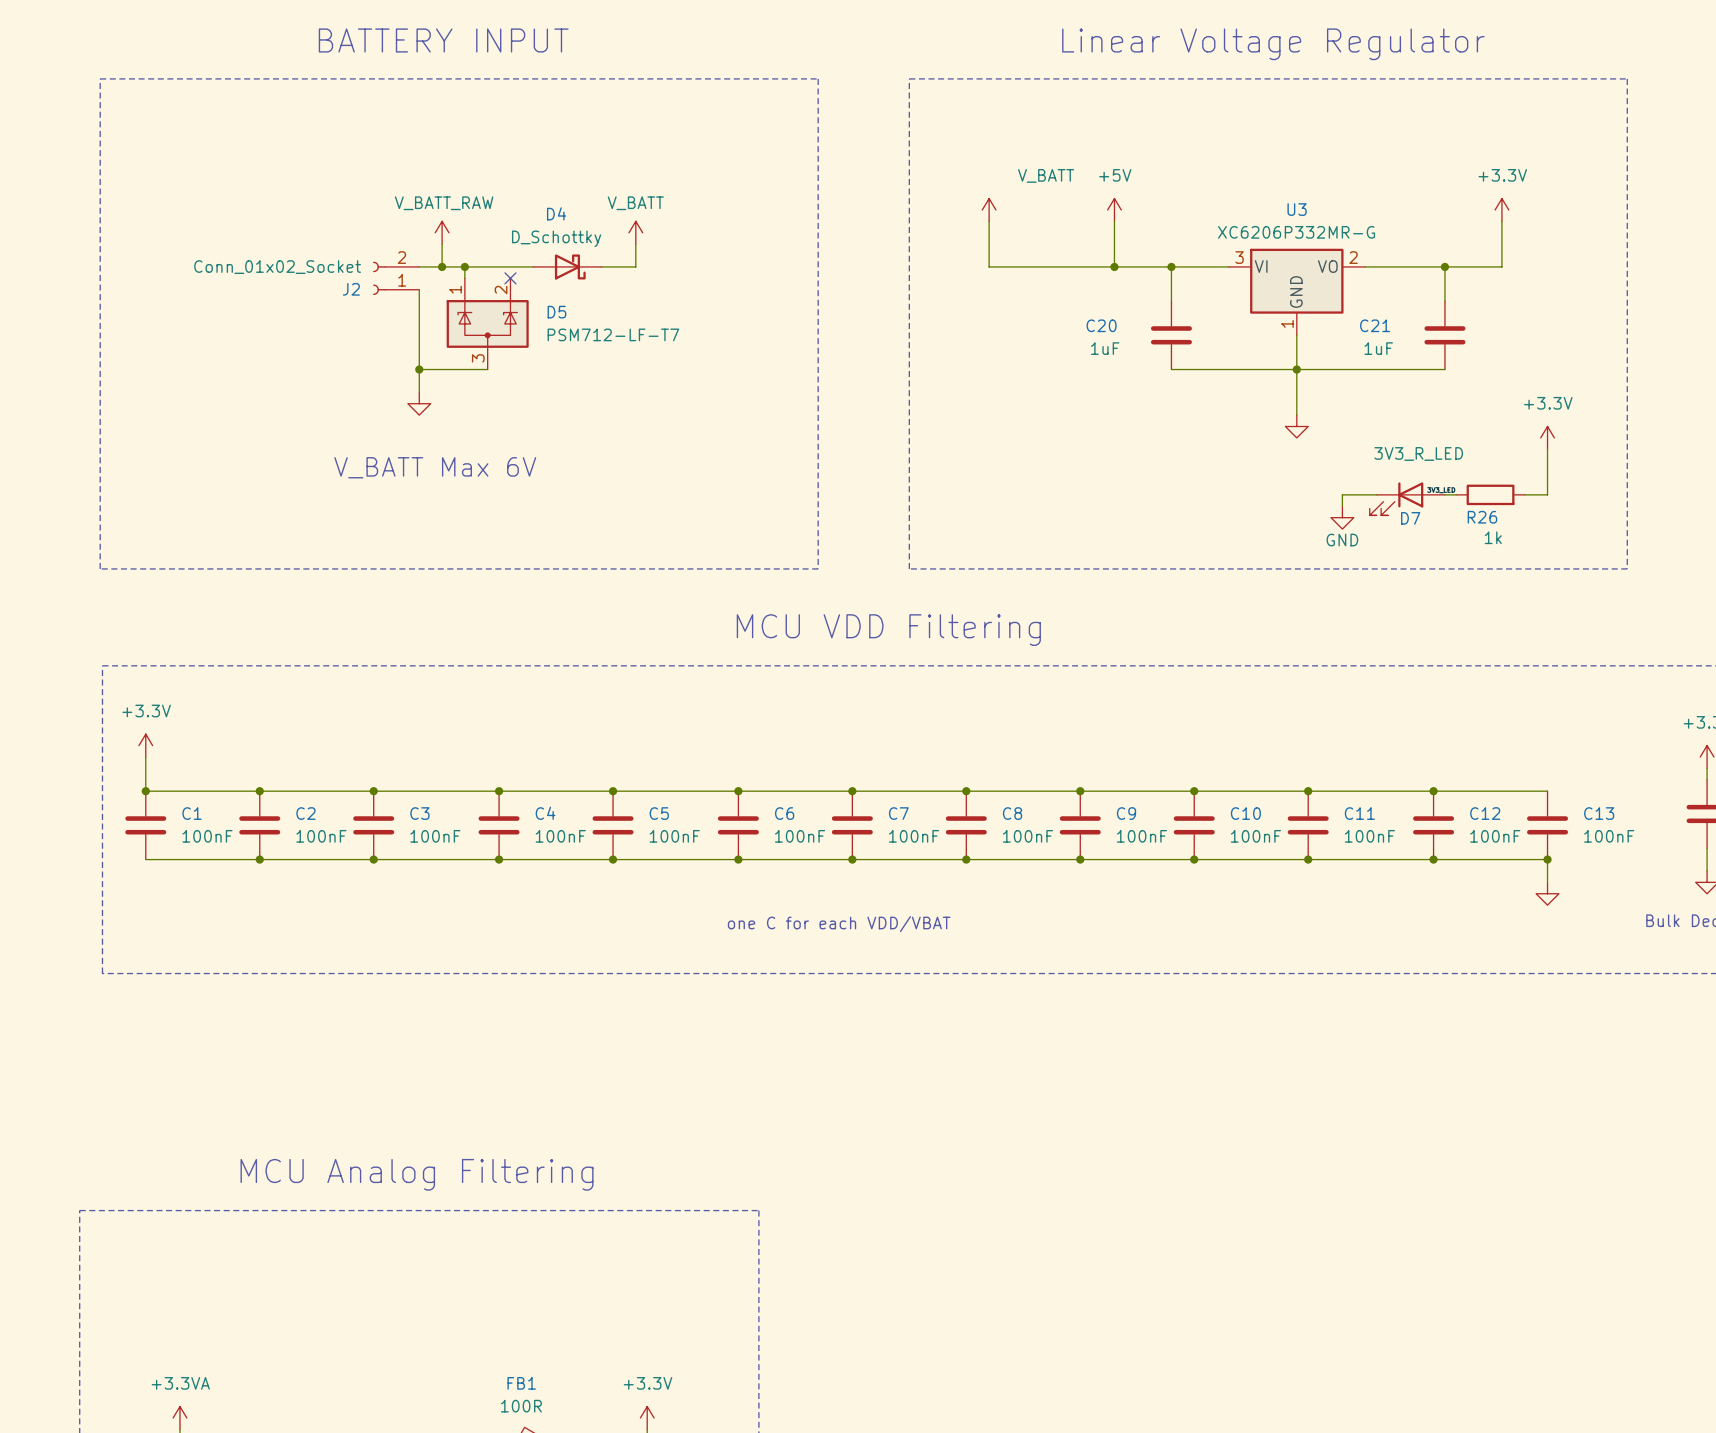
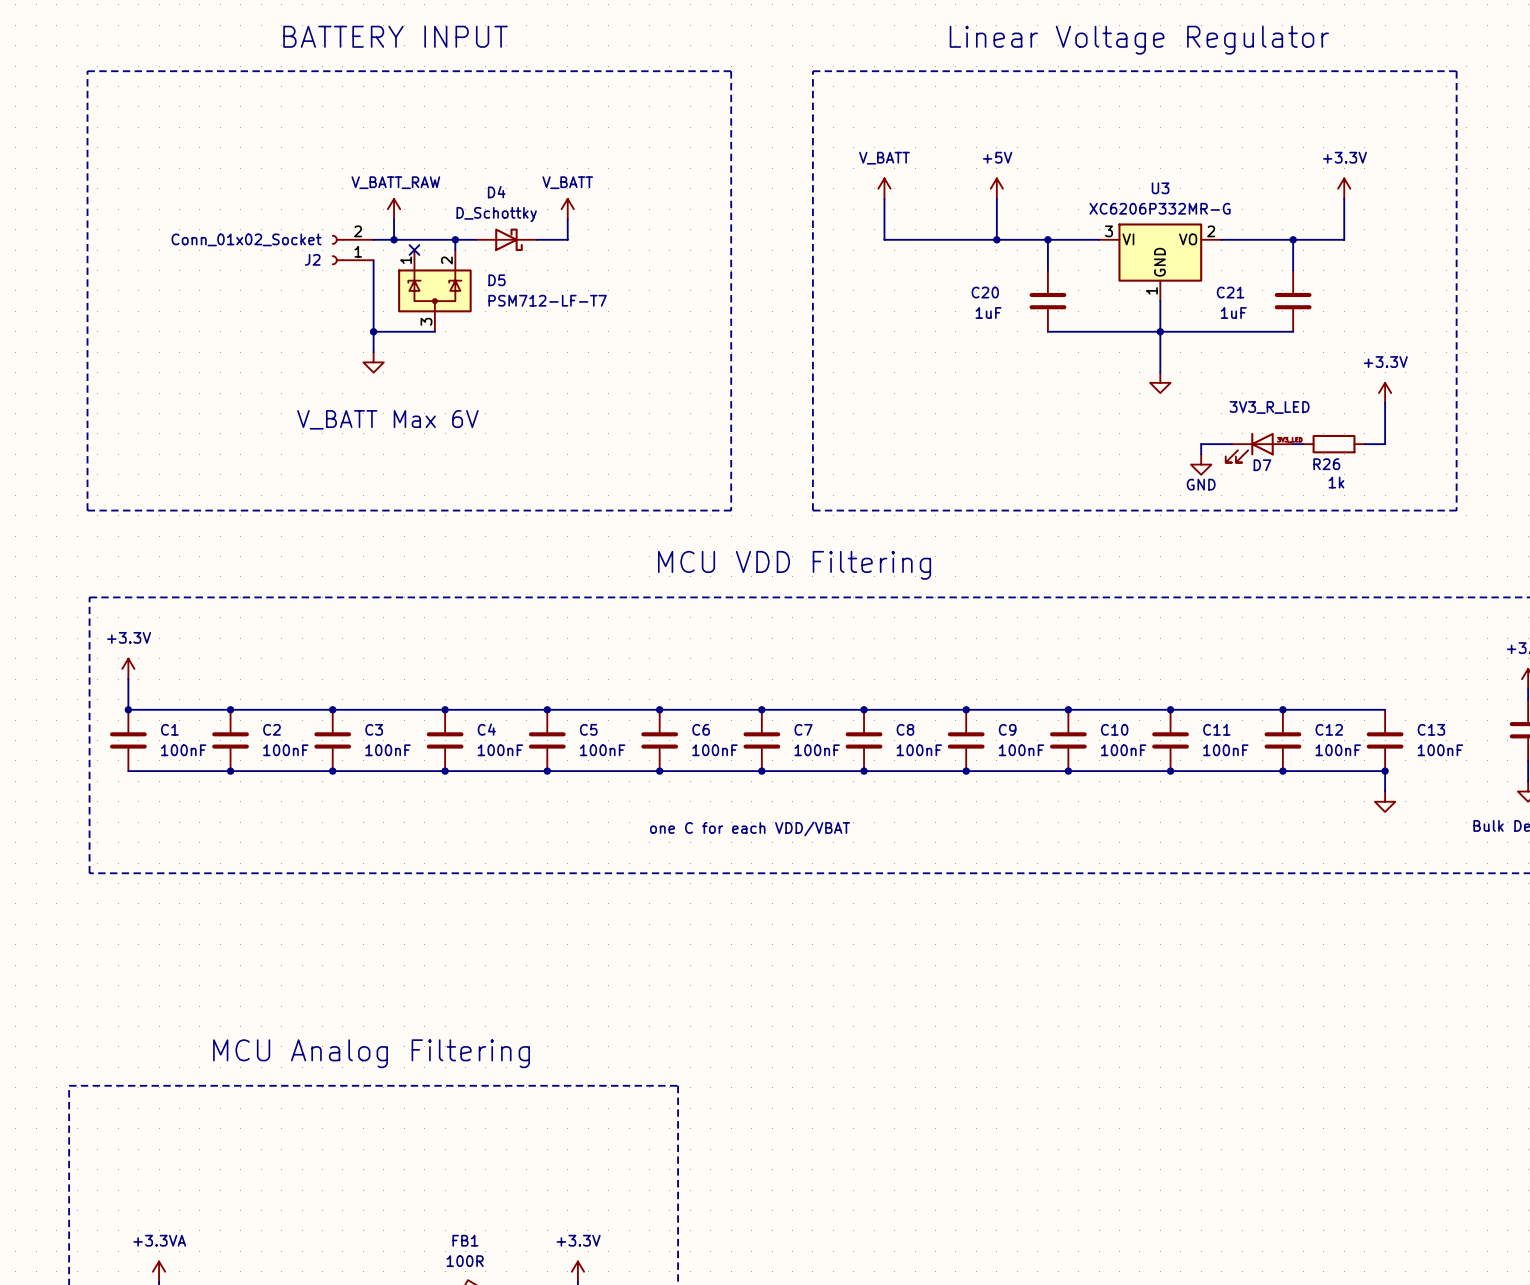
power symbol text position: V_BATT (1046, 175) -> V_BATT (884, 158)
wire: (464, 266) (464, 278) -> (455, 239) (455, 250)
junction position: (464, 266) -> (455, 239)
no-connect mark position: (510, 278) -> (414, 250)

